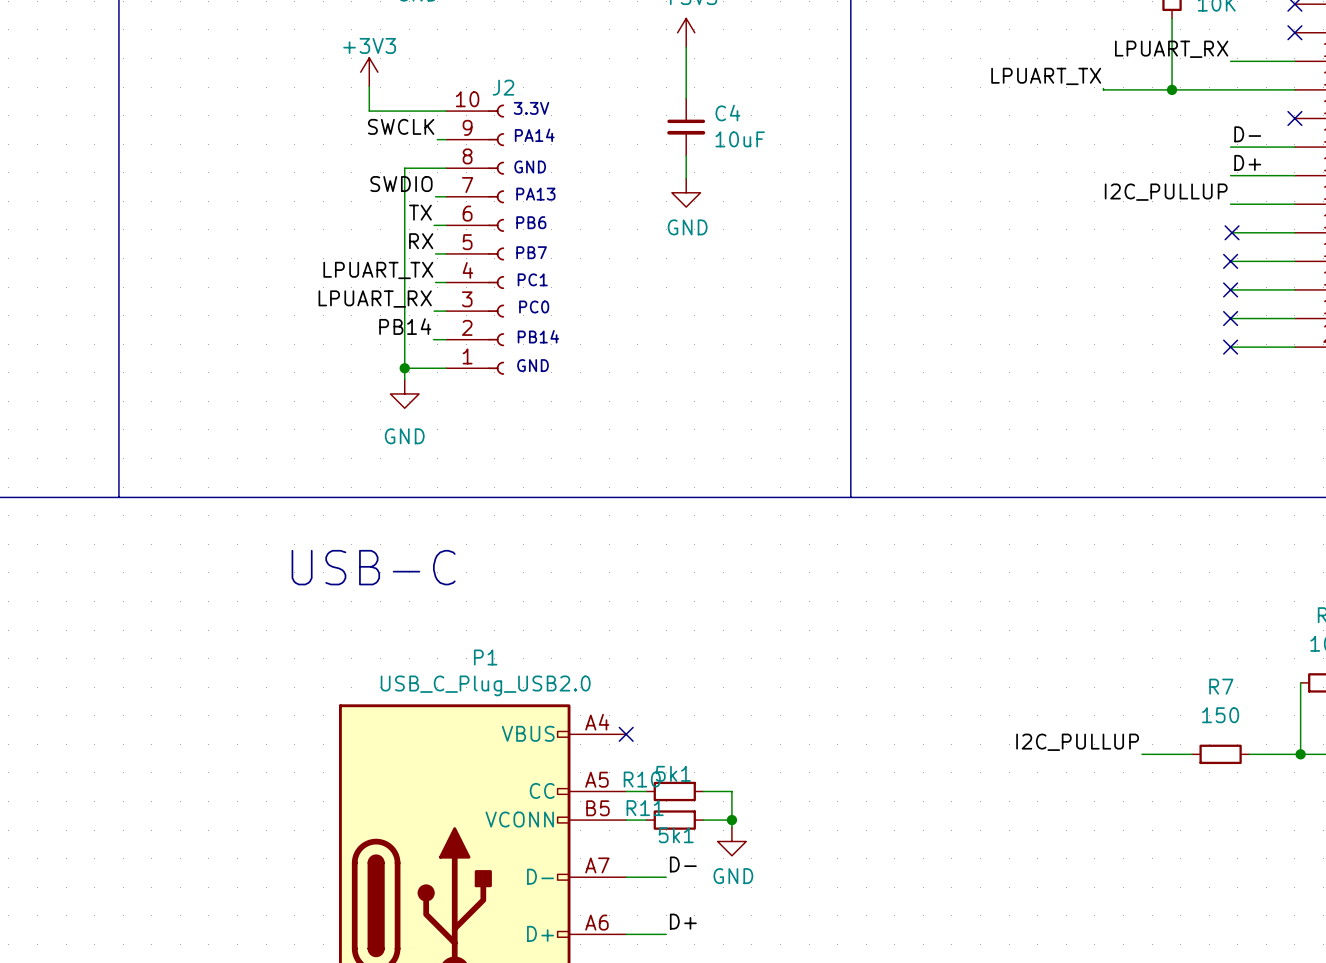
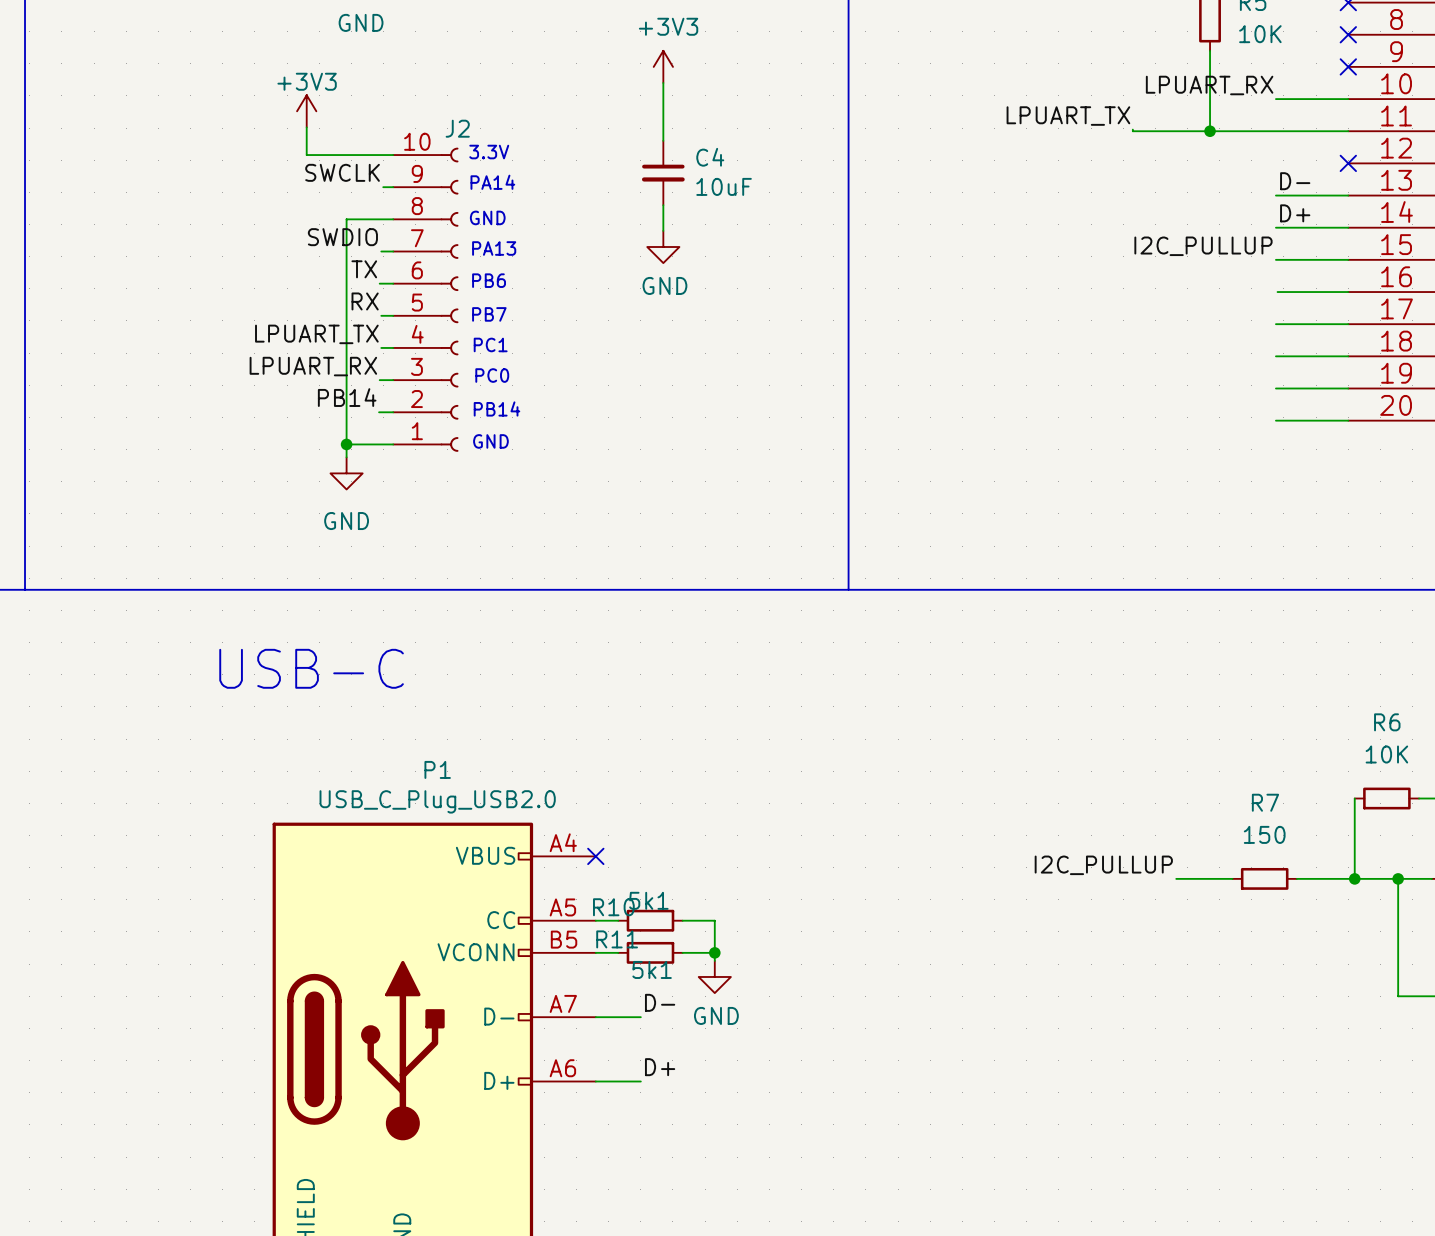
no-connect mark: (1232, 232) -> none
no-connect mark: (1230, 261) -> none
no-connect mark: (1230, 289) -> none
no-connect mark: (1230, 318) -> none
no-connect mark: (1230, 347) -> none

